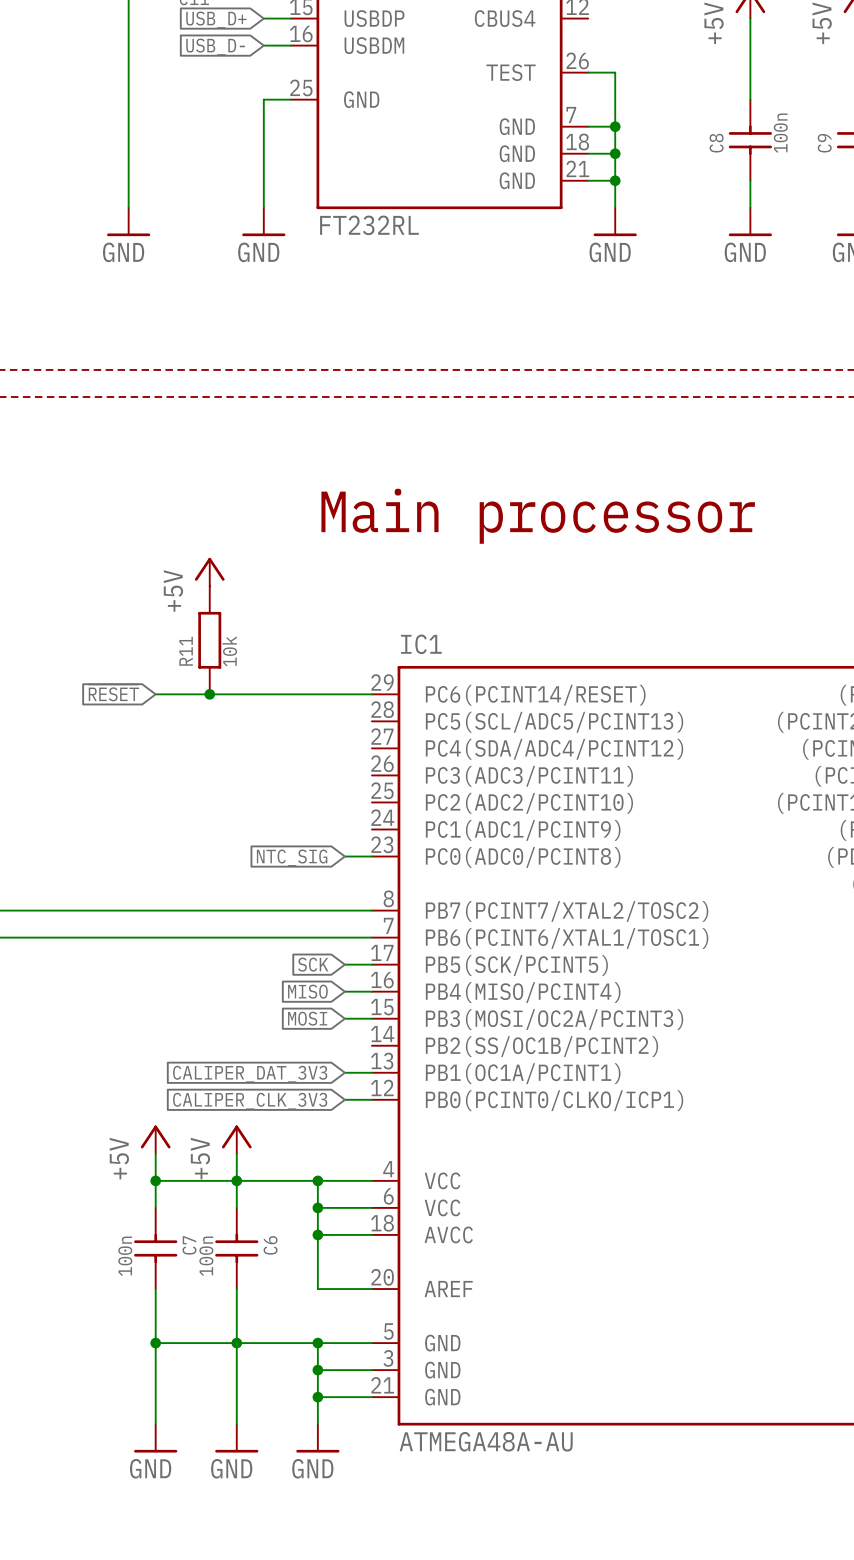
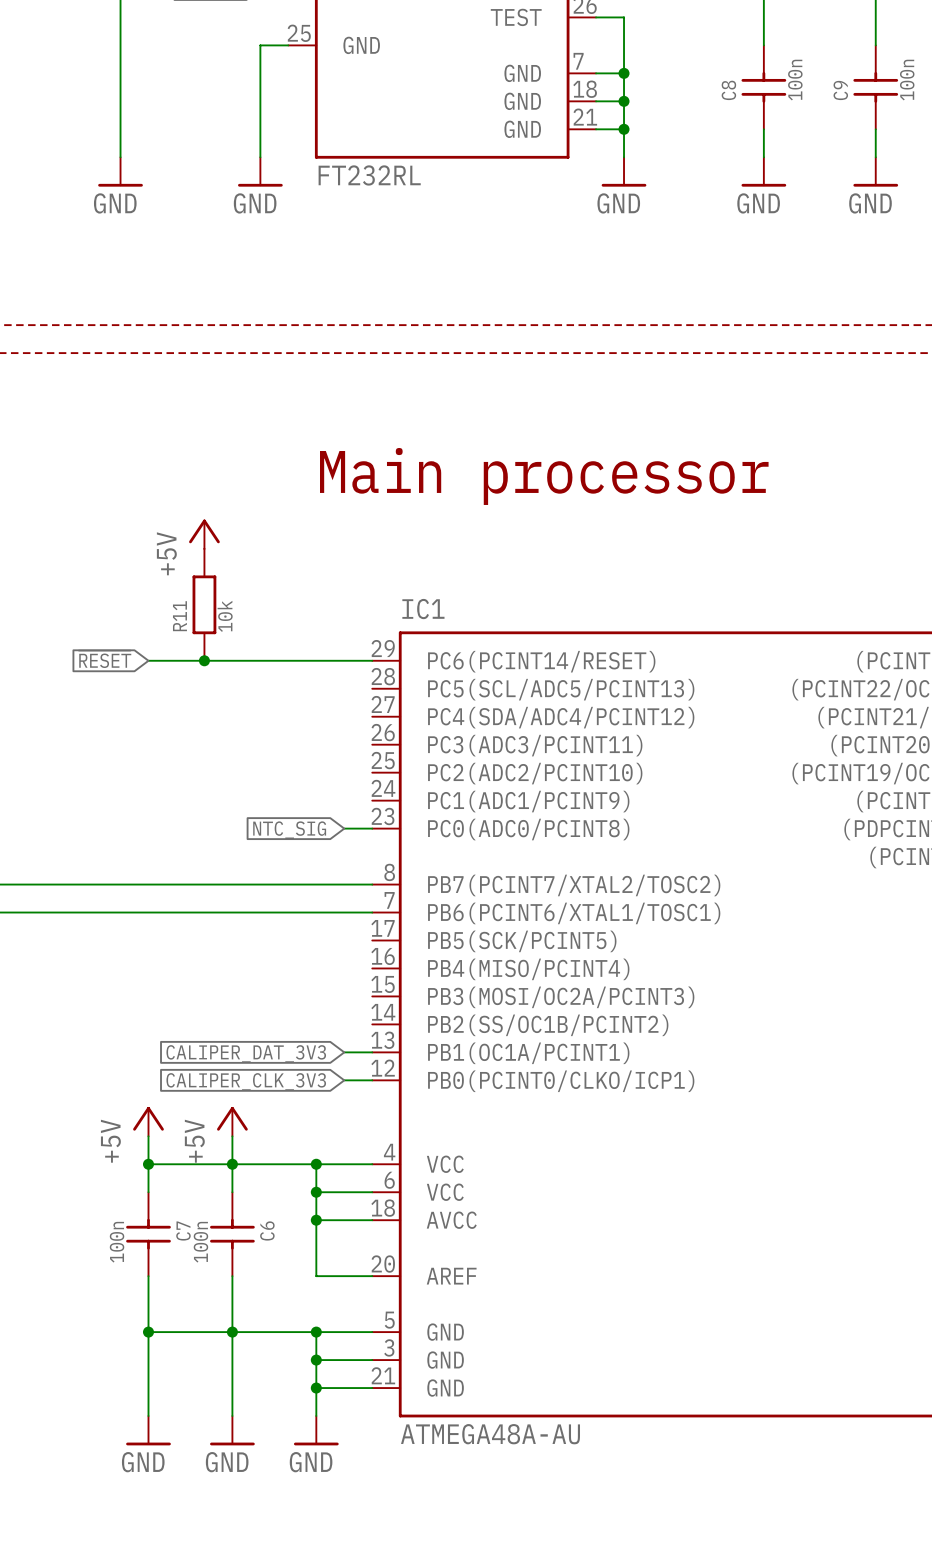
global label: SCK (313, 964) -> none
wire: (344, 964) (371, 964) -> none
global label: MISO (307, 991) -> none
wire: (344, 991) (371, 991) -> none
global label: MOSI (307, 1018) -> none
wire: (344, 1018) (371, 1018) -> none

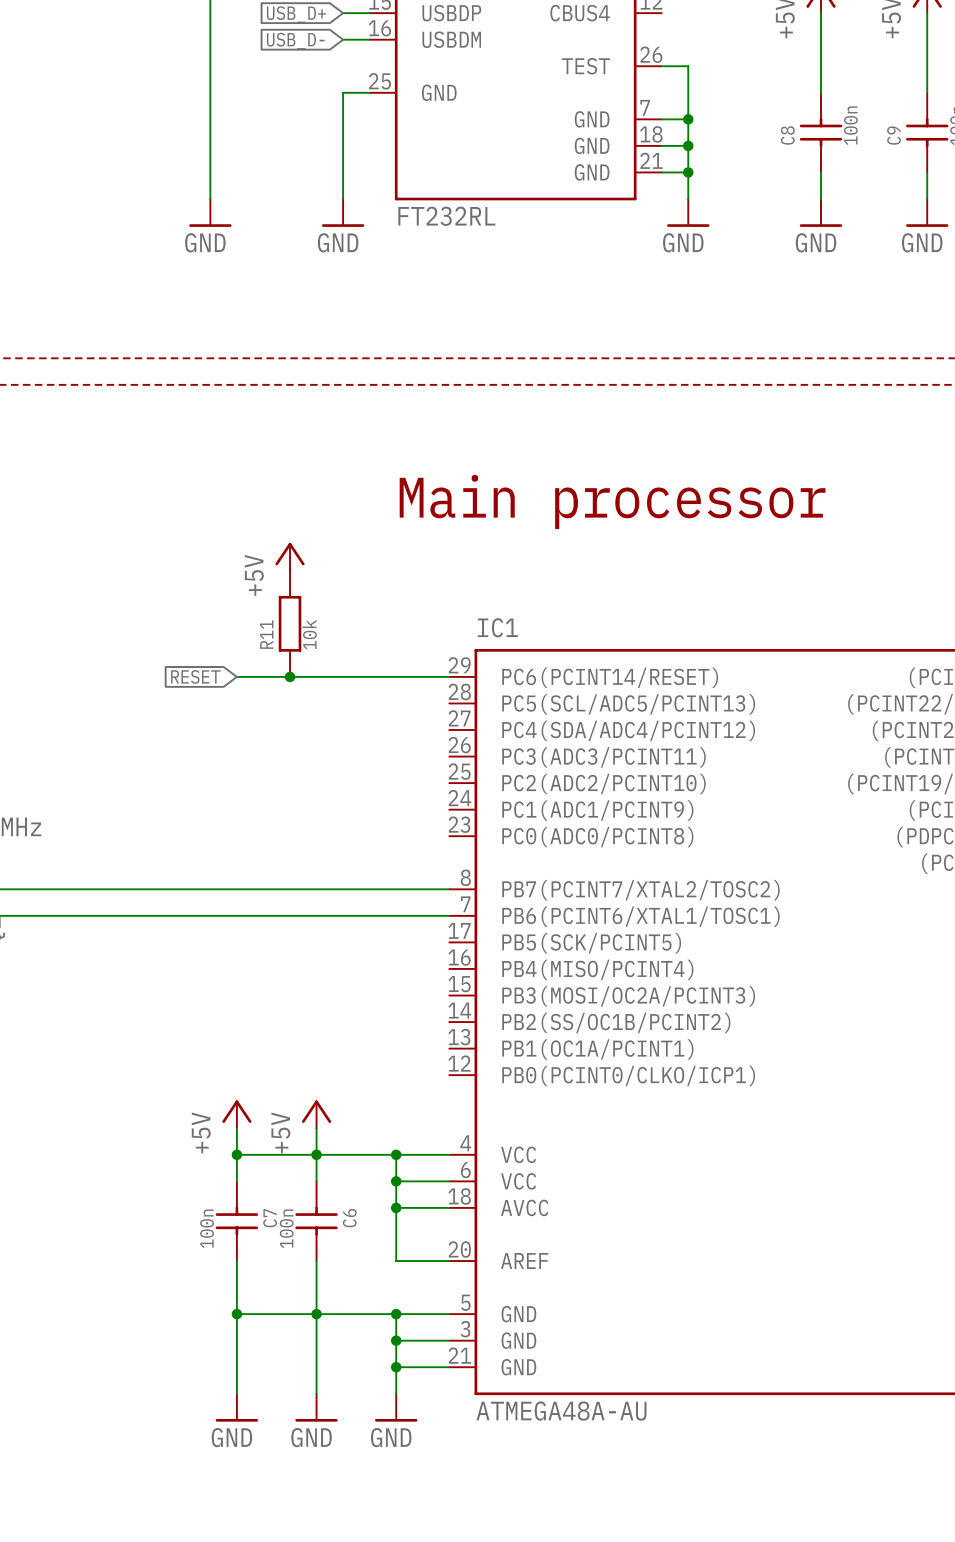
wire: (344, 828) (372, 828) -> none
global label: NTC_SIG (289, 830) -> none
wire: (344, 1052) (372, 1052) -> none
global label: CALIPER_DAT_3V3 (246, 1053) -> none
wire: (344, 1080) (372, 1080) -> none
global label: CALIPER_CLK_3V3 (246, 1081) -> none

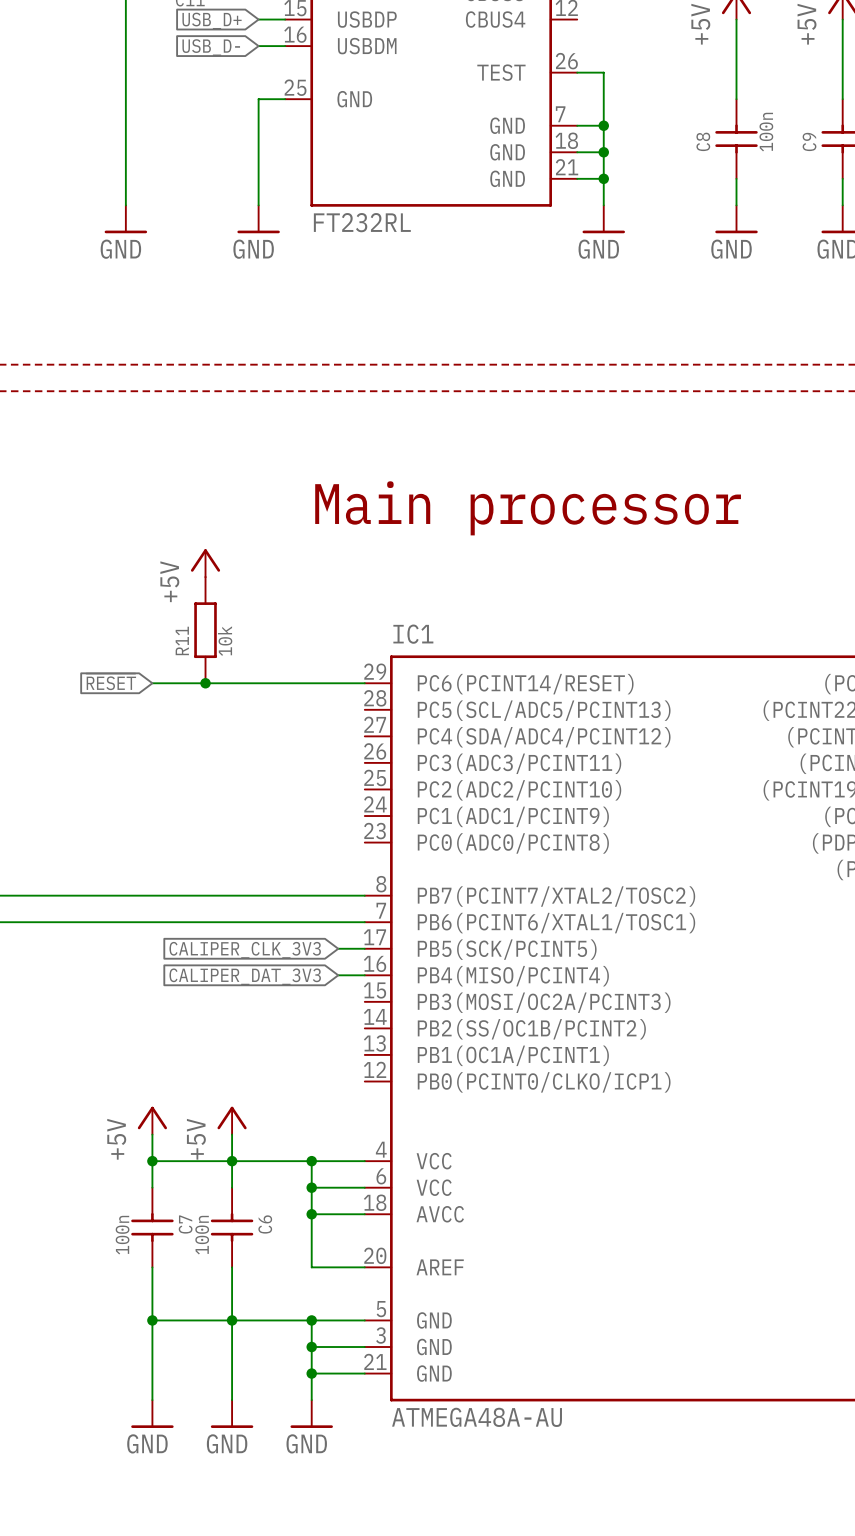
wire: none -> (338, 948) (364, 948)
global label: none -> CALIPER_CLK_3V3 (245, 950)
wire: none -> (338, 975) (364, 975)
global label: none -> CALIPER_DAT_3V3 (245, 976)

